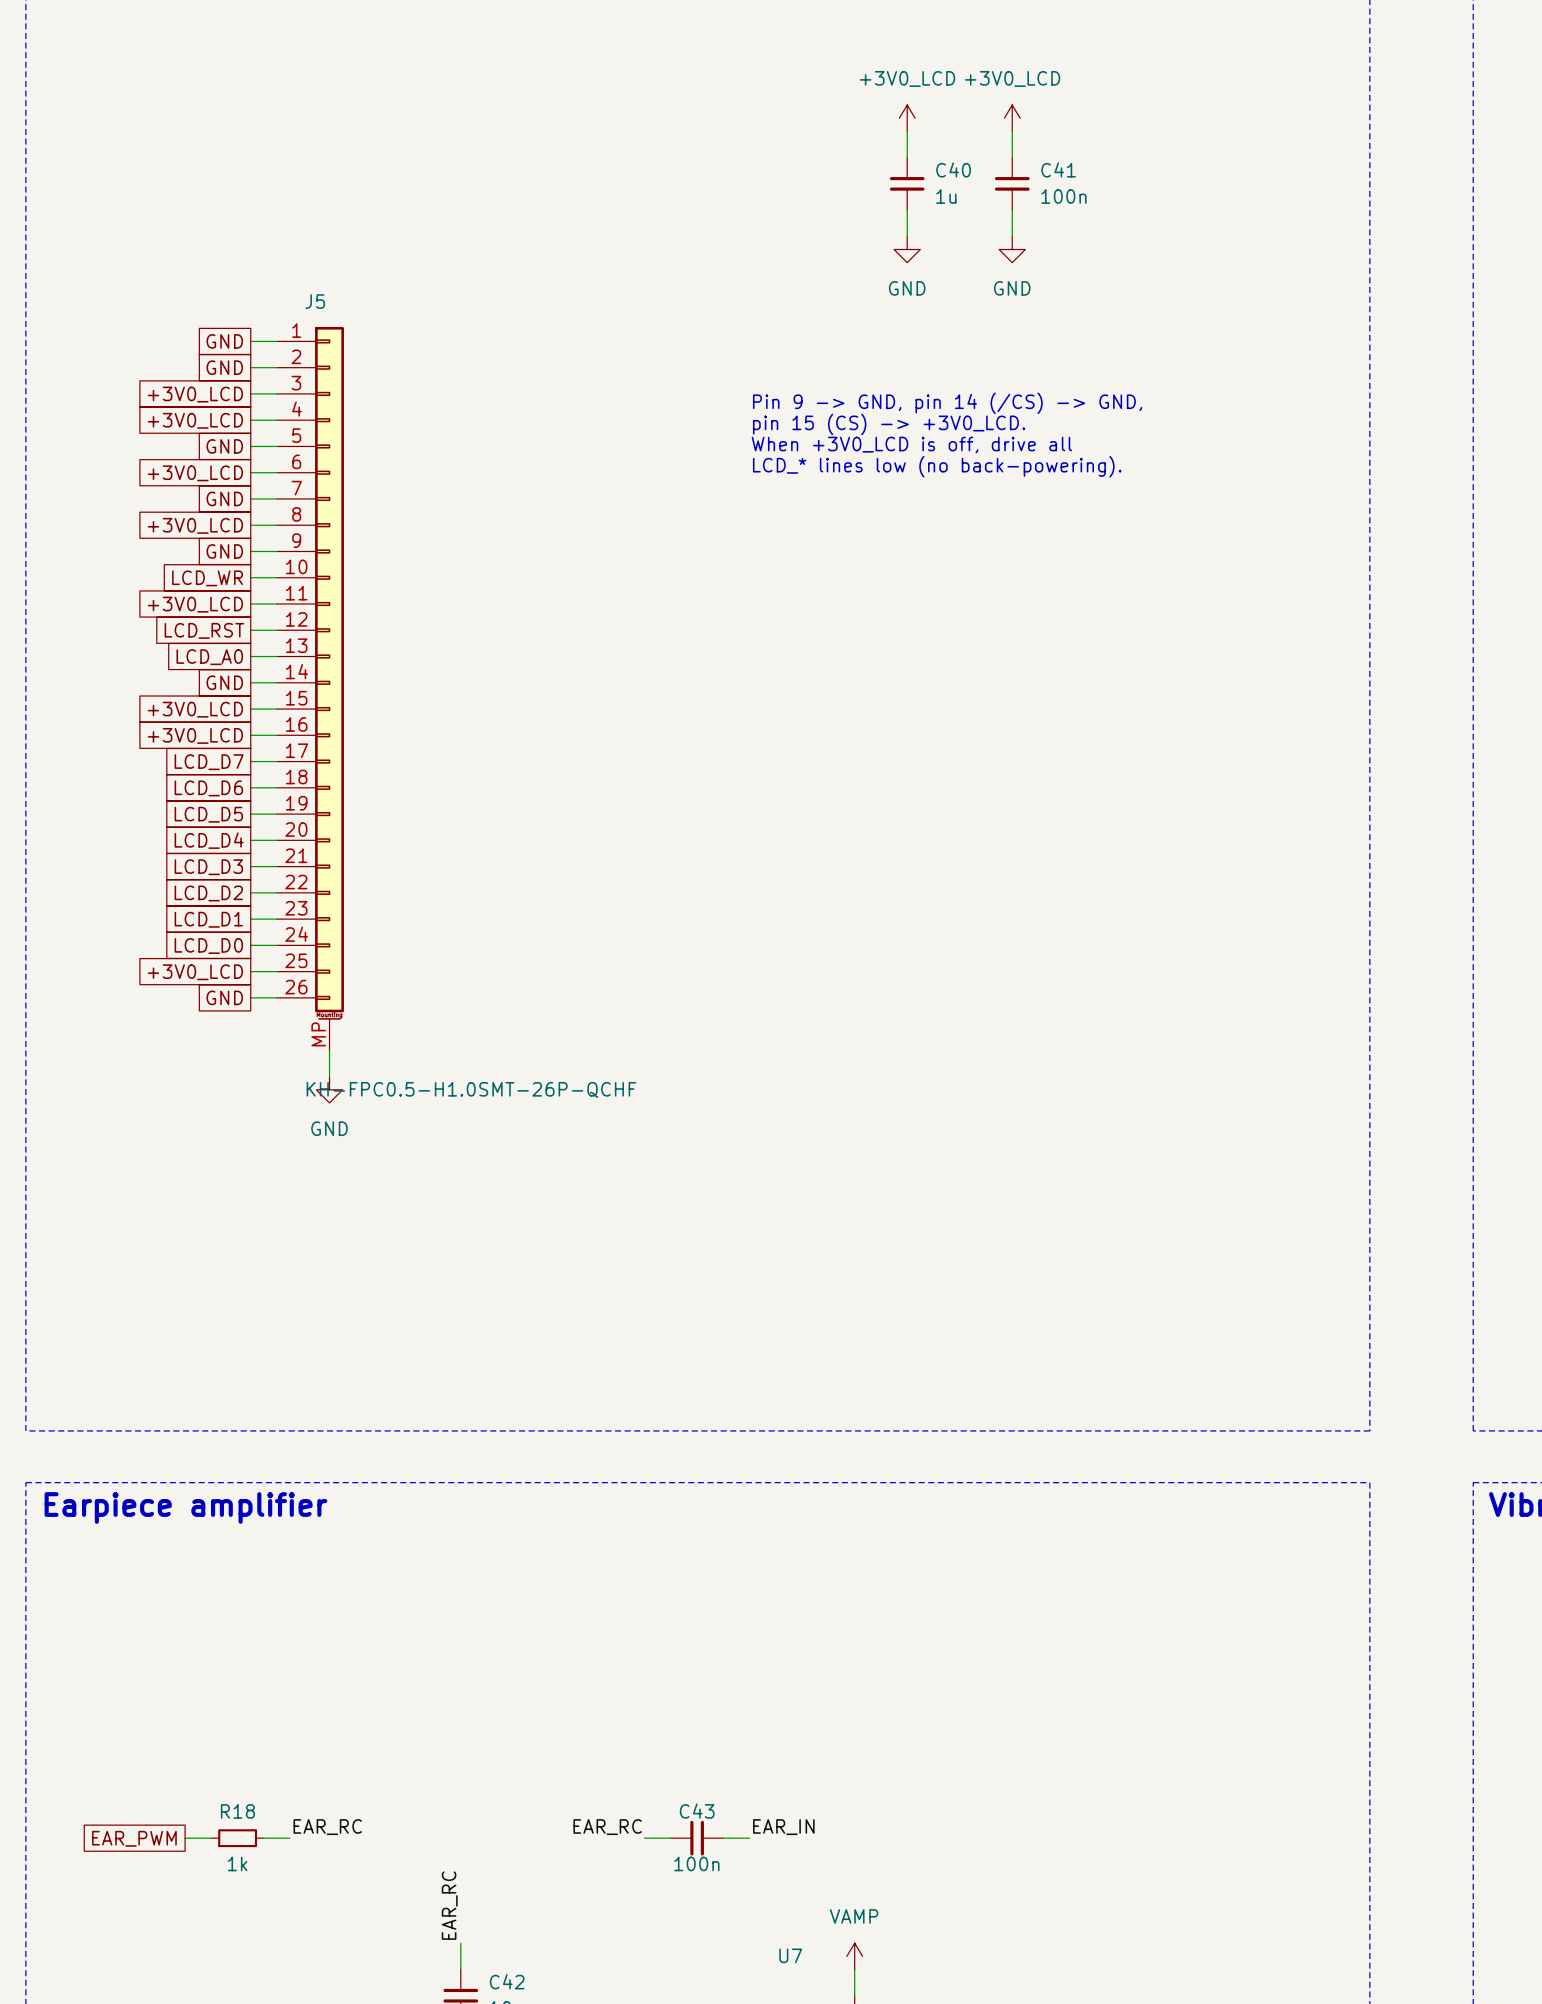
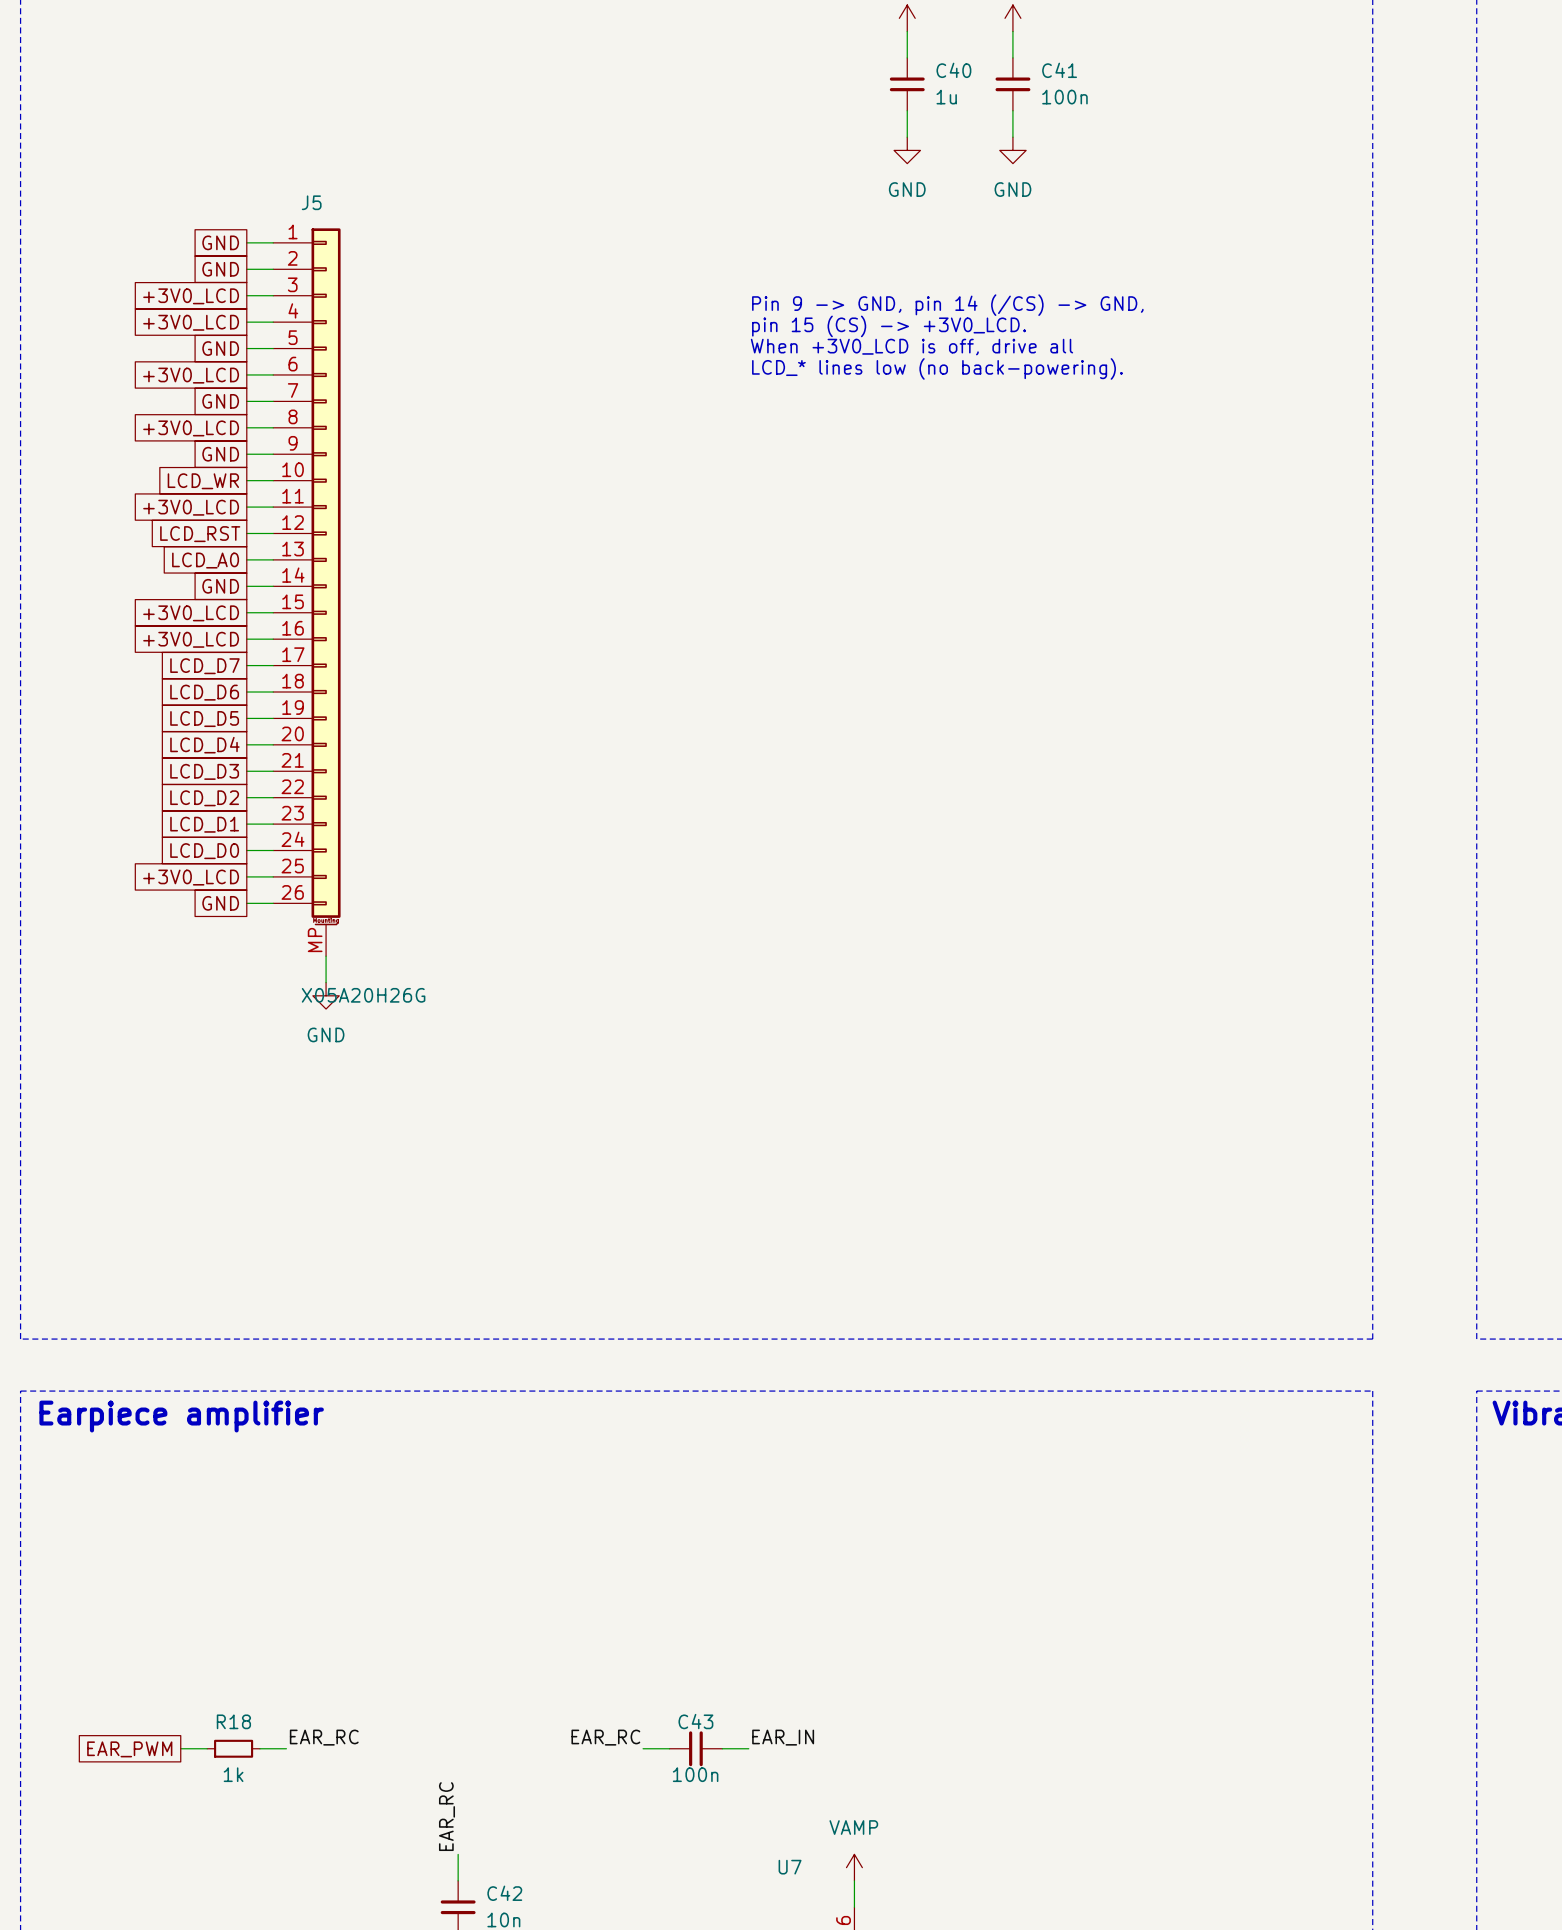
J5 value: KH-FPC0.5-H1.0SMT-26P-QCHF (471, 1089) -> X05A20H26G (363, 995)

